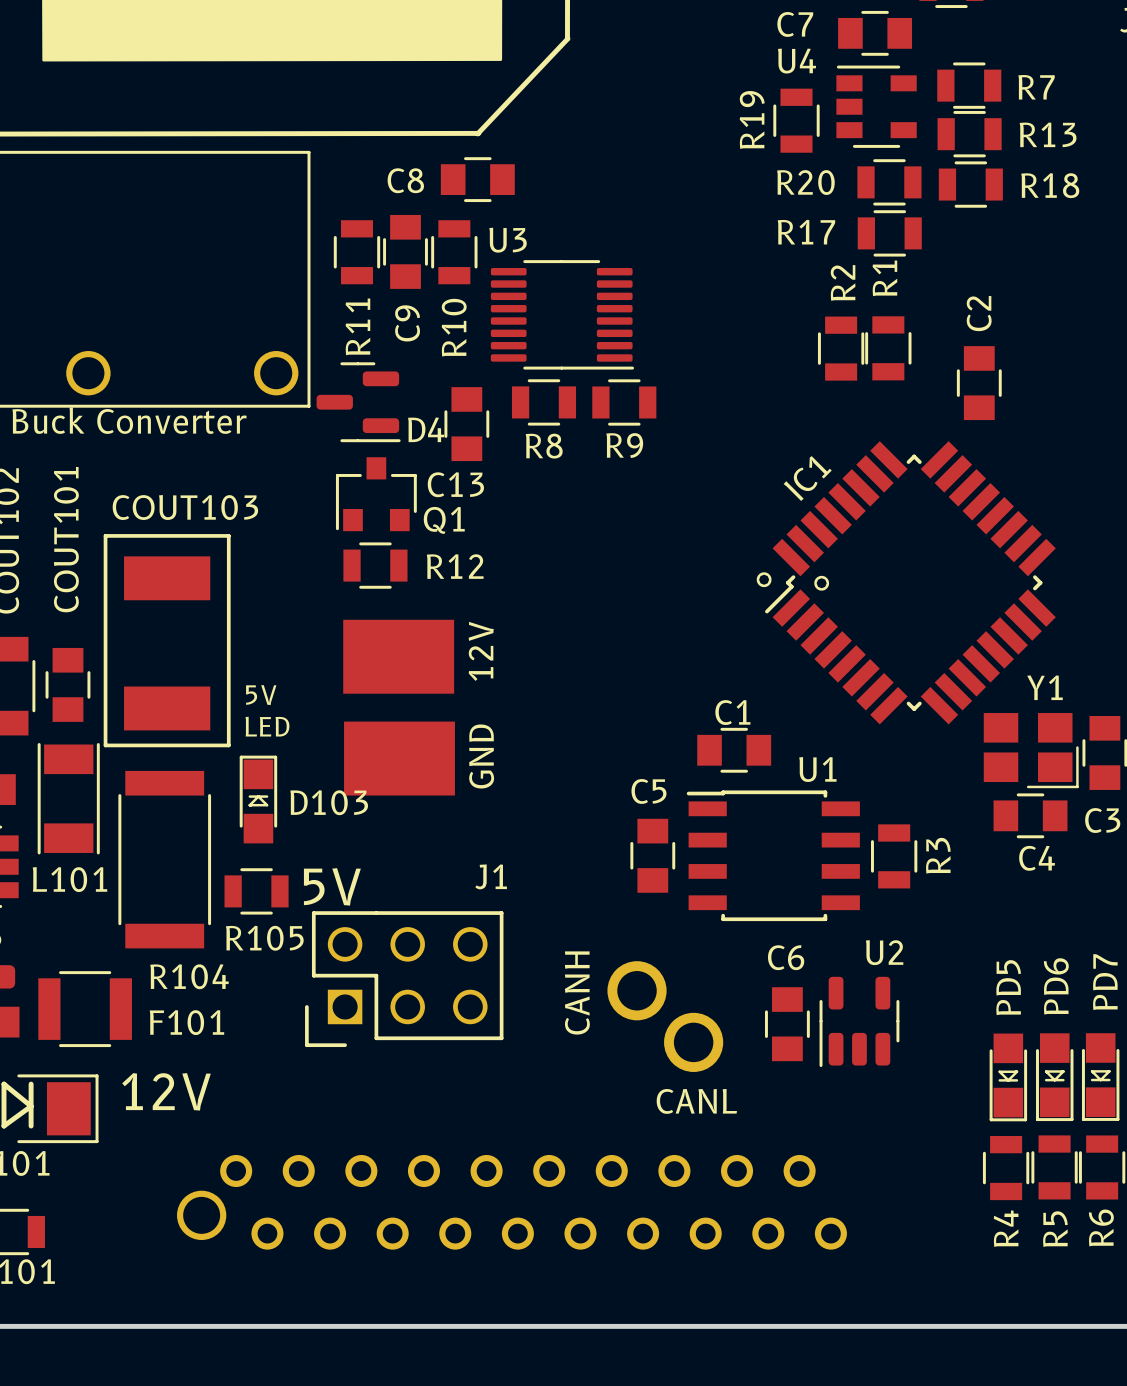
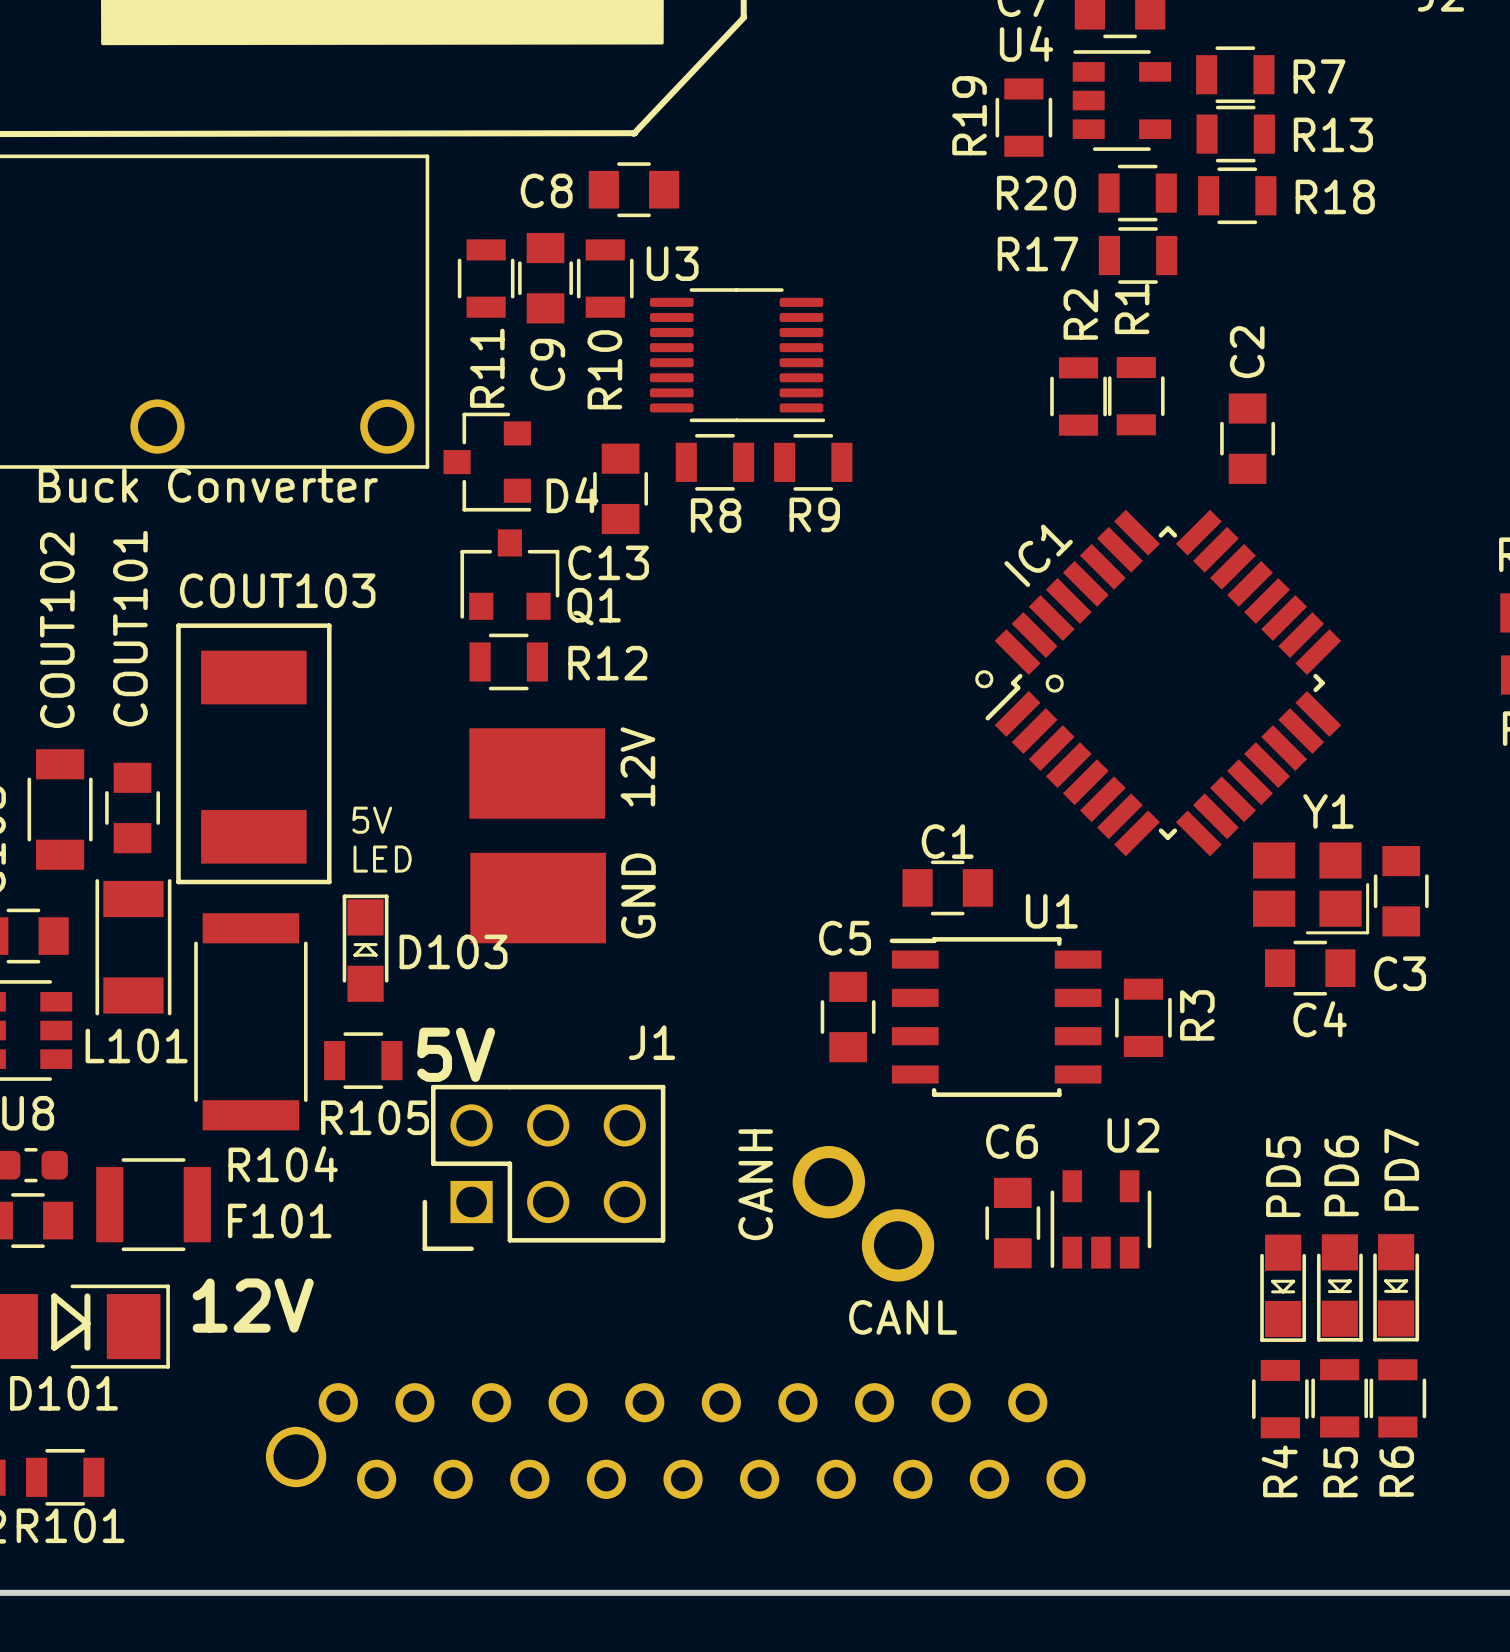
D4 footprint: [316, 362, 401, 443] -> [443, 412, 532, 512]
U2 footprint: [819, 976, 900, 1068] -> [1050, 1170, 1152, 1269]

